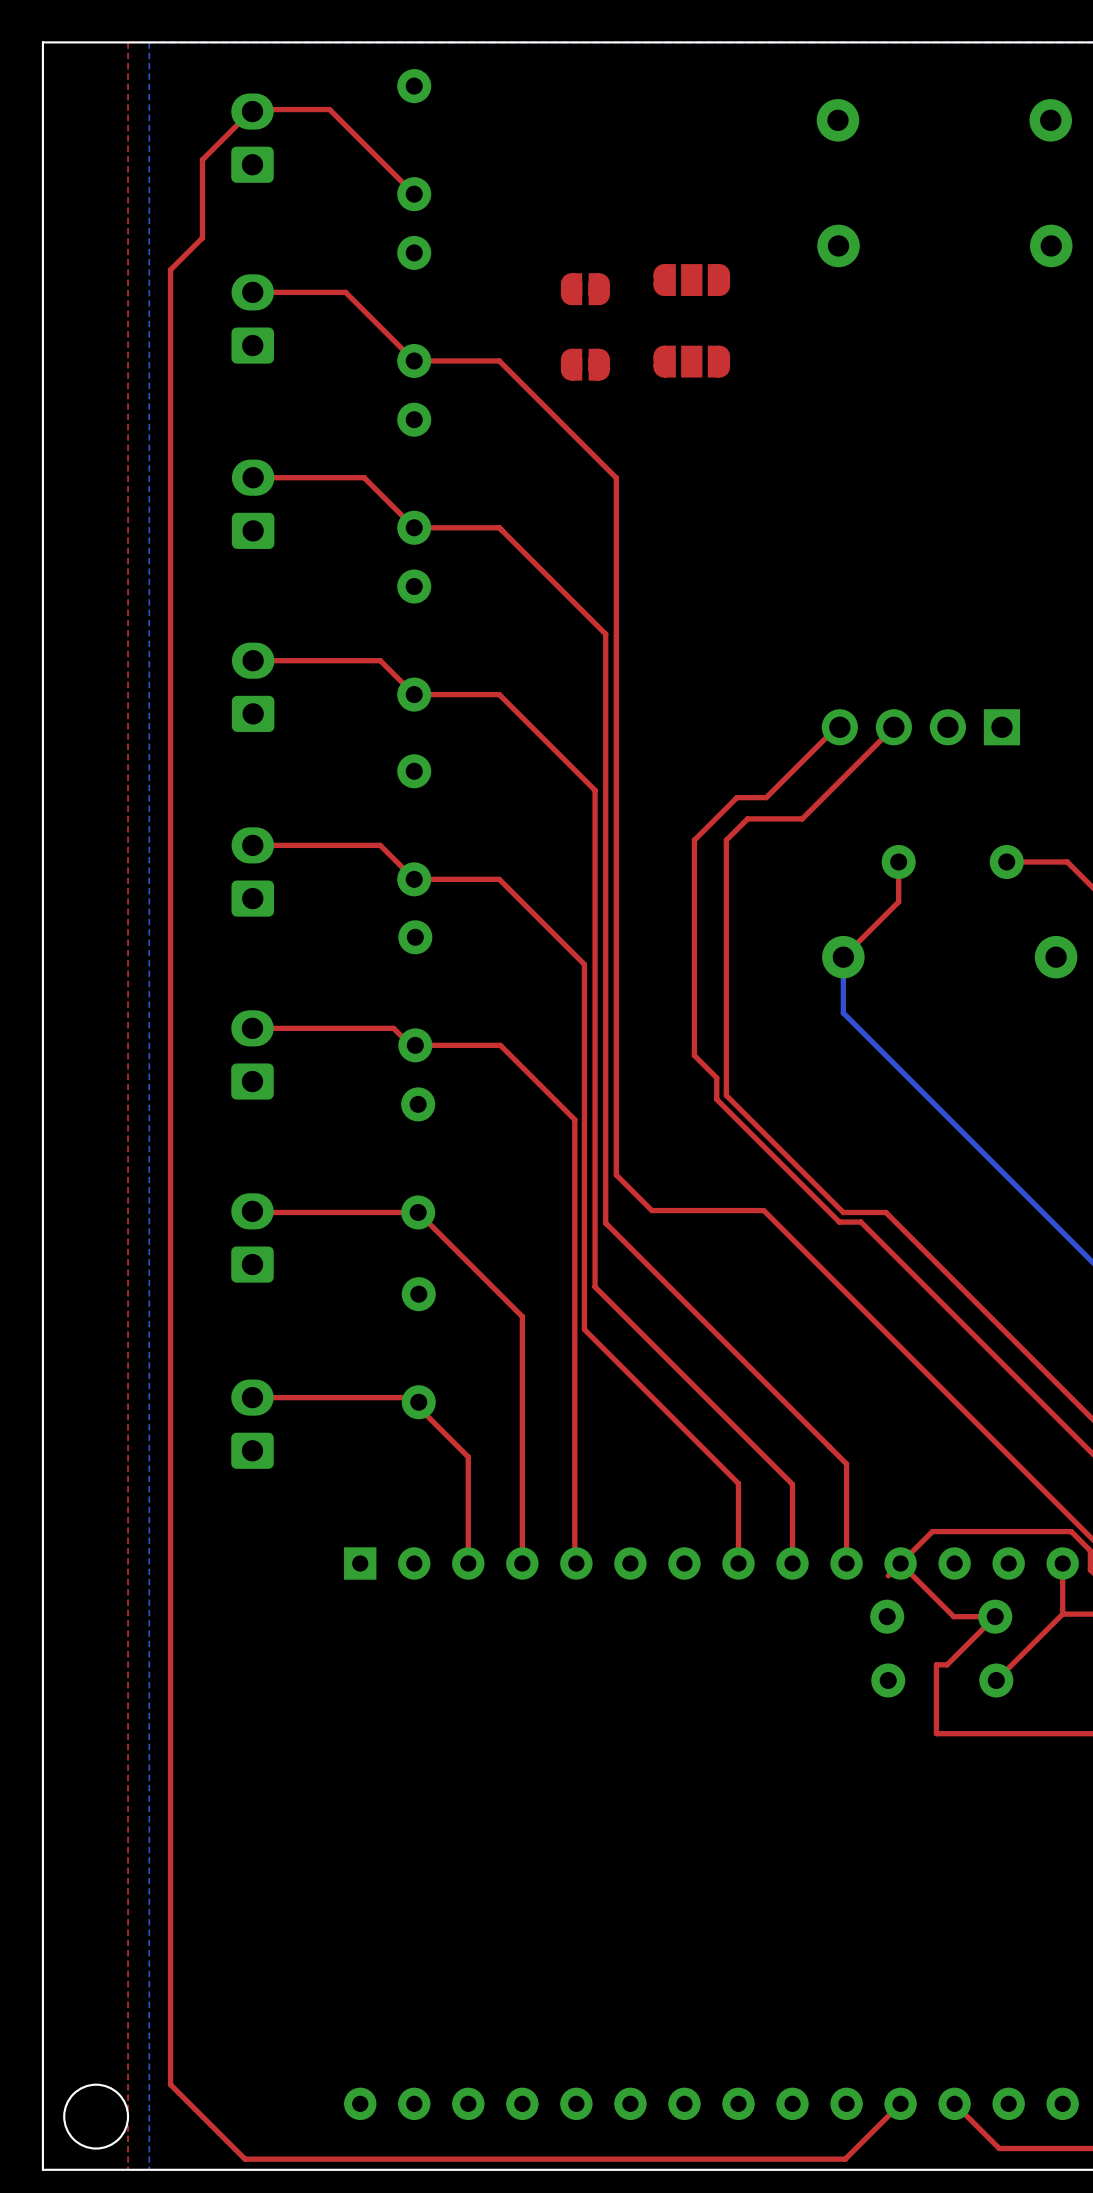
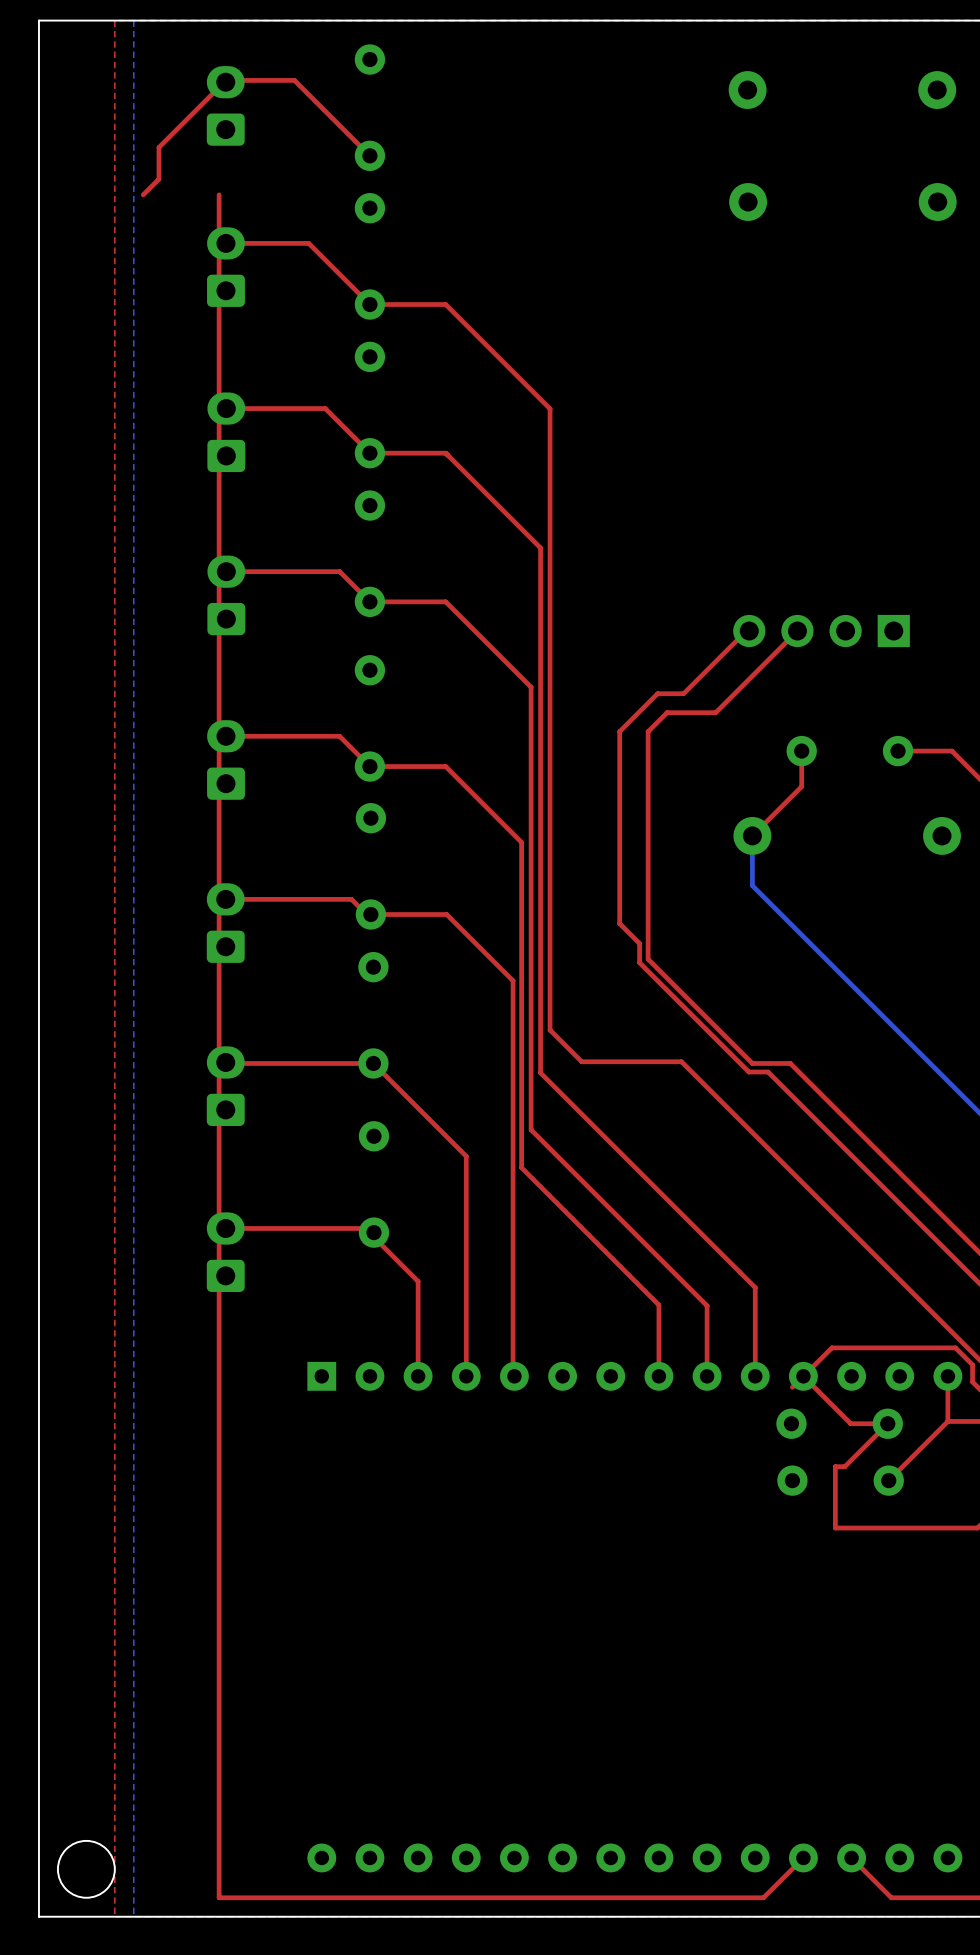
top track: (202, 159) (202, 237) (170, 269) (170, 2084) (245, 2159) (845, 2159) (855, 2148) -> (219, 194) (219, 1897) (763, 1897)
top track: none -> (181, 125) (158, 147) (158, 179) (143, 194)
part: (691, 280) -> none
part: (585, 289) -> none
part: (691, 361) -> none
part: (585, 364) -> none

